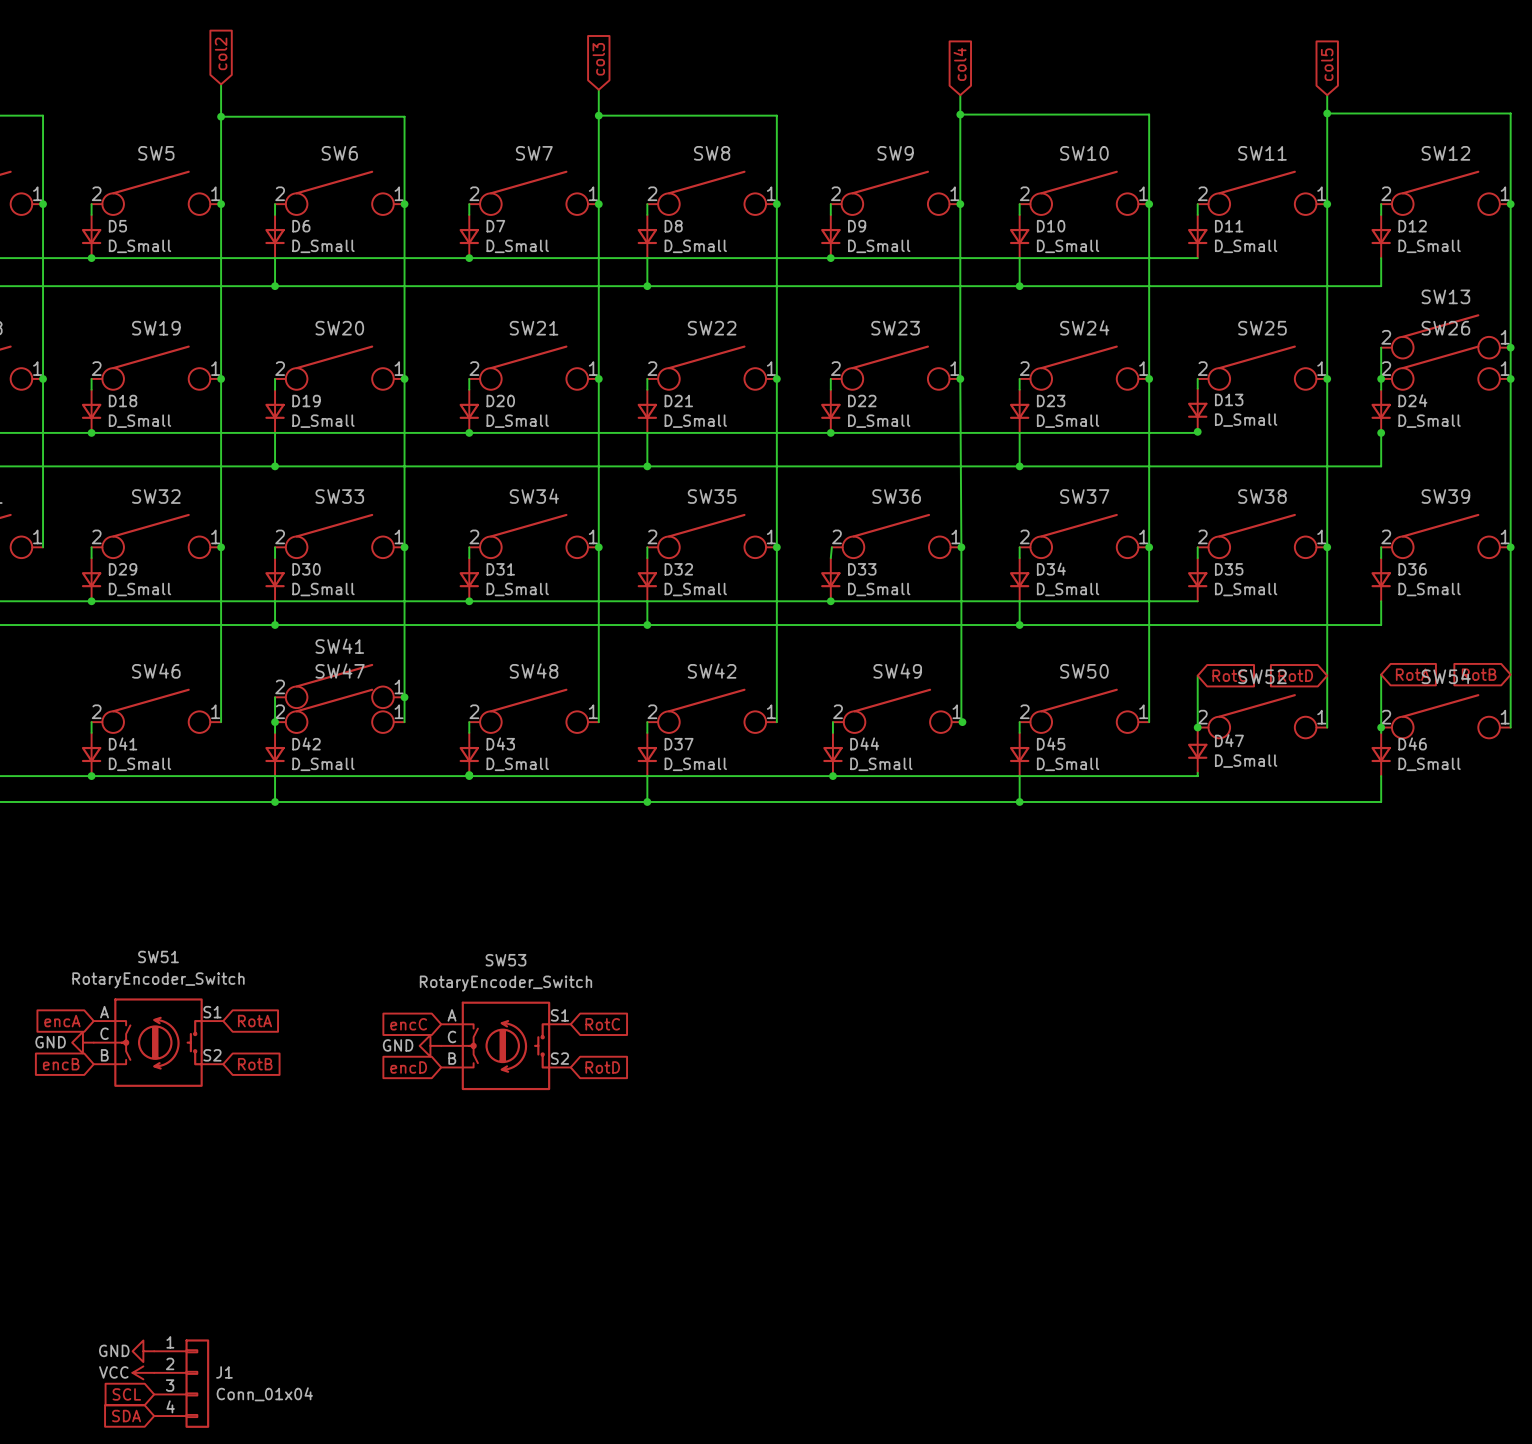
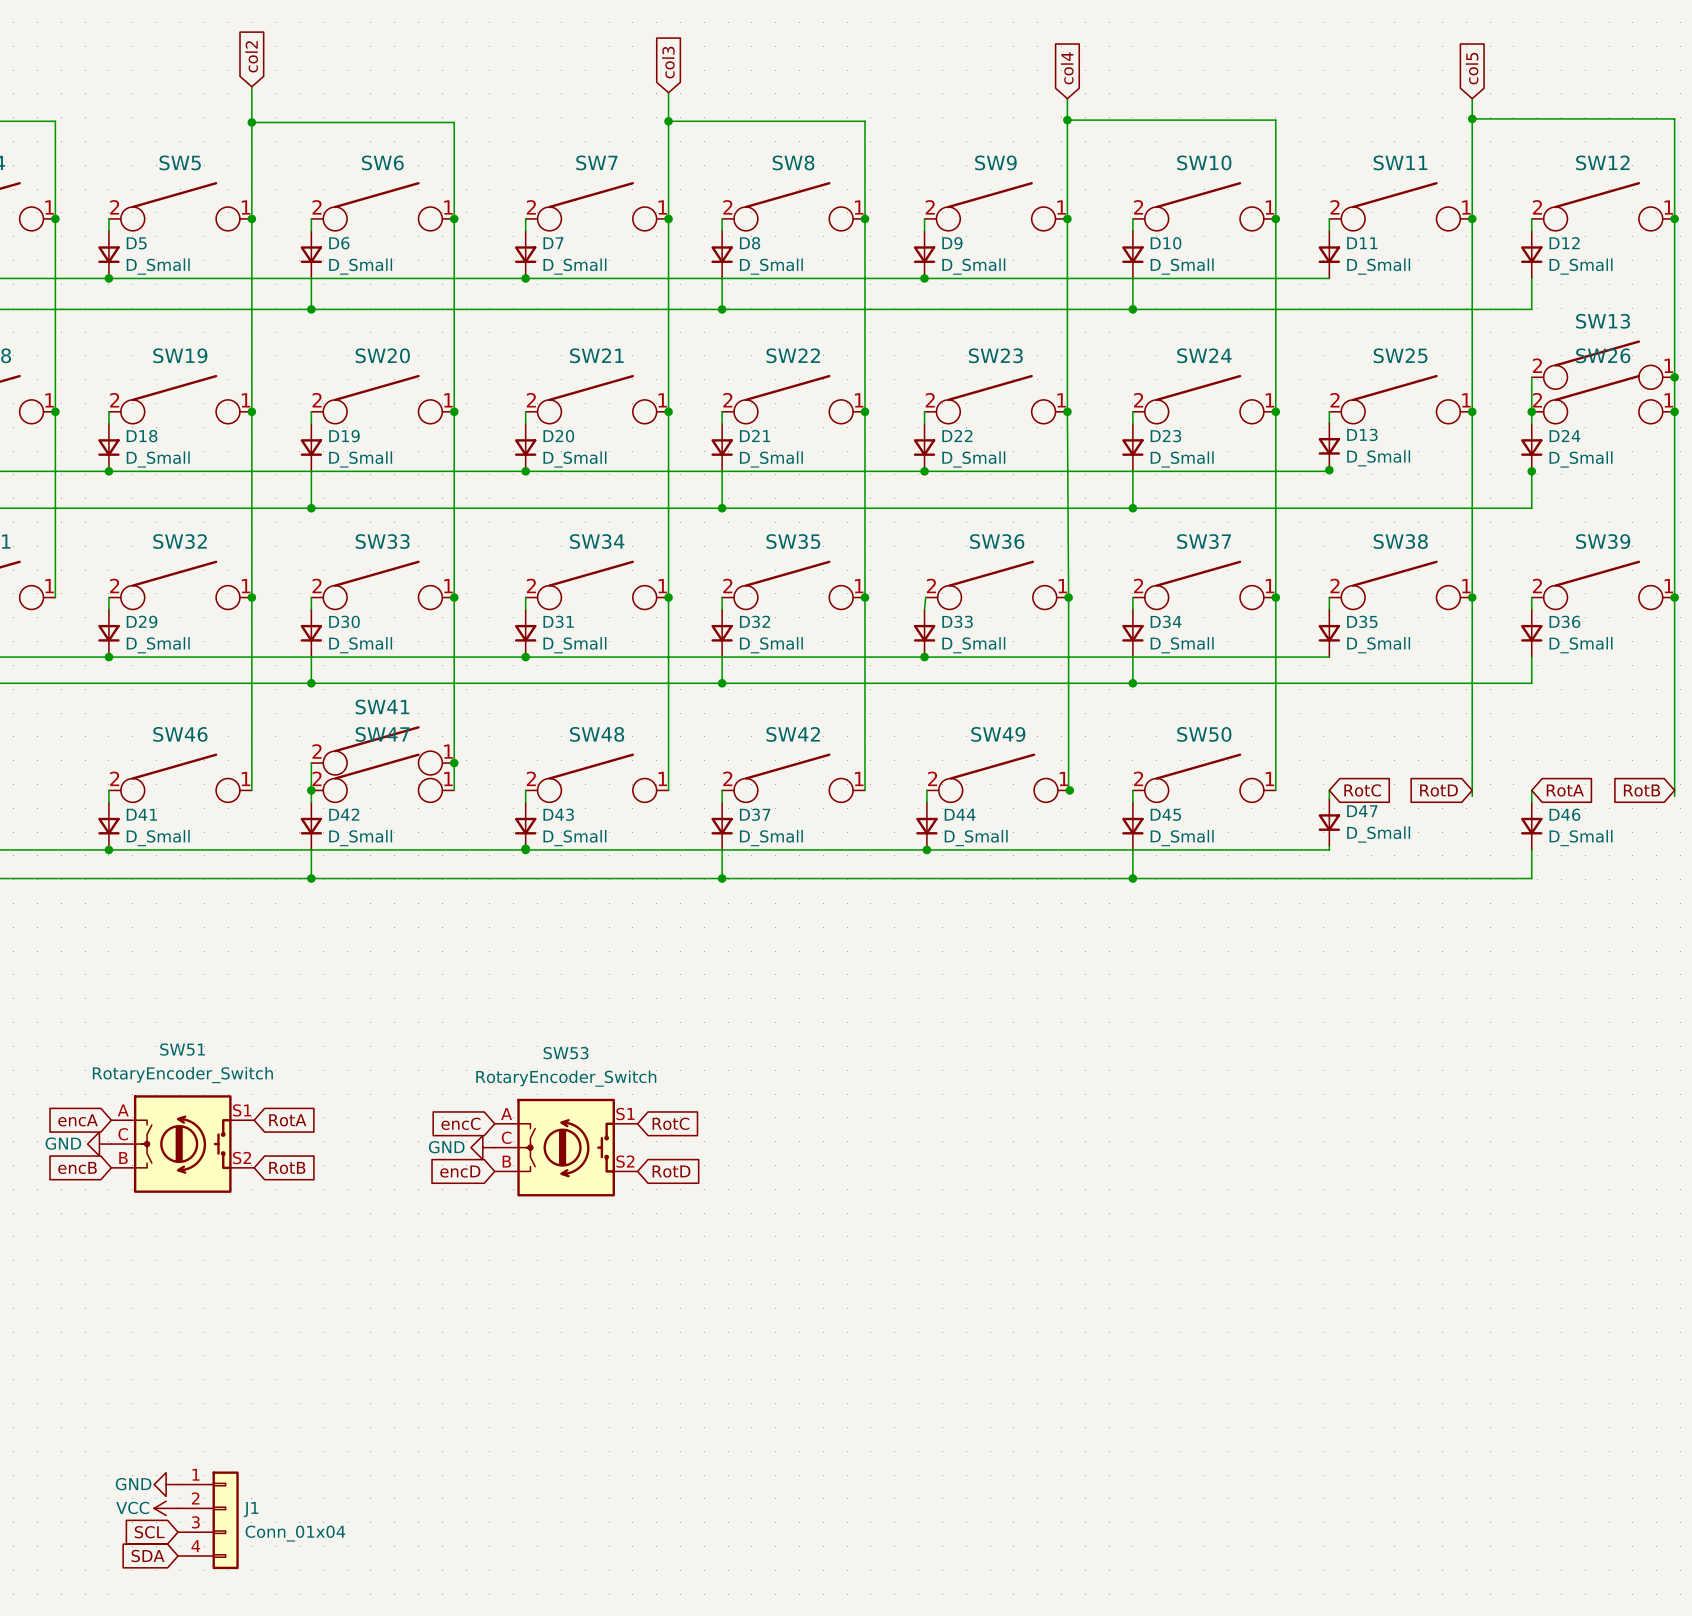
wire: (1381, 674) (1381, 722) -> none
global label position: RotA (1412, 674) -> RotA (1565, 790)
global label position: RotB (1479, 674) -> RotB (1641, 790)
wire: (1197, 675) (1197, 722) -> none
global label position: RotC (1229, 675) -> RotC (1362, 790)
global label position: RotD (1295, 675) -> RotD (1438, 790)
SW52: (1262, 716) -> none
SW54: (1445, 716) -> none
junction: (1197, 727) -> none
junction: (1381, 727) -> none

